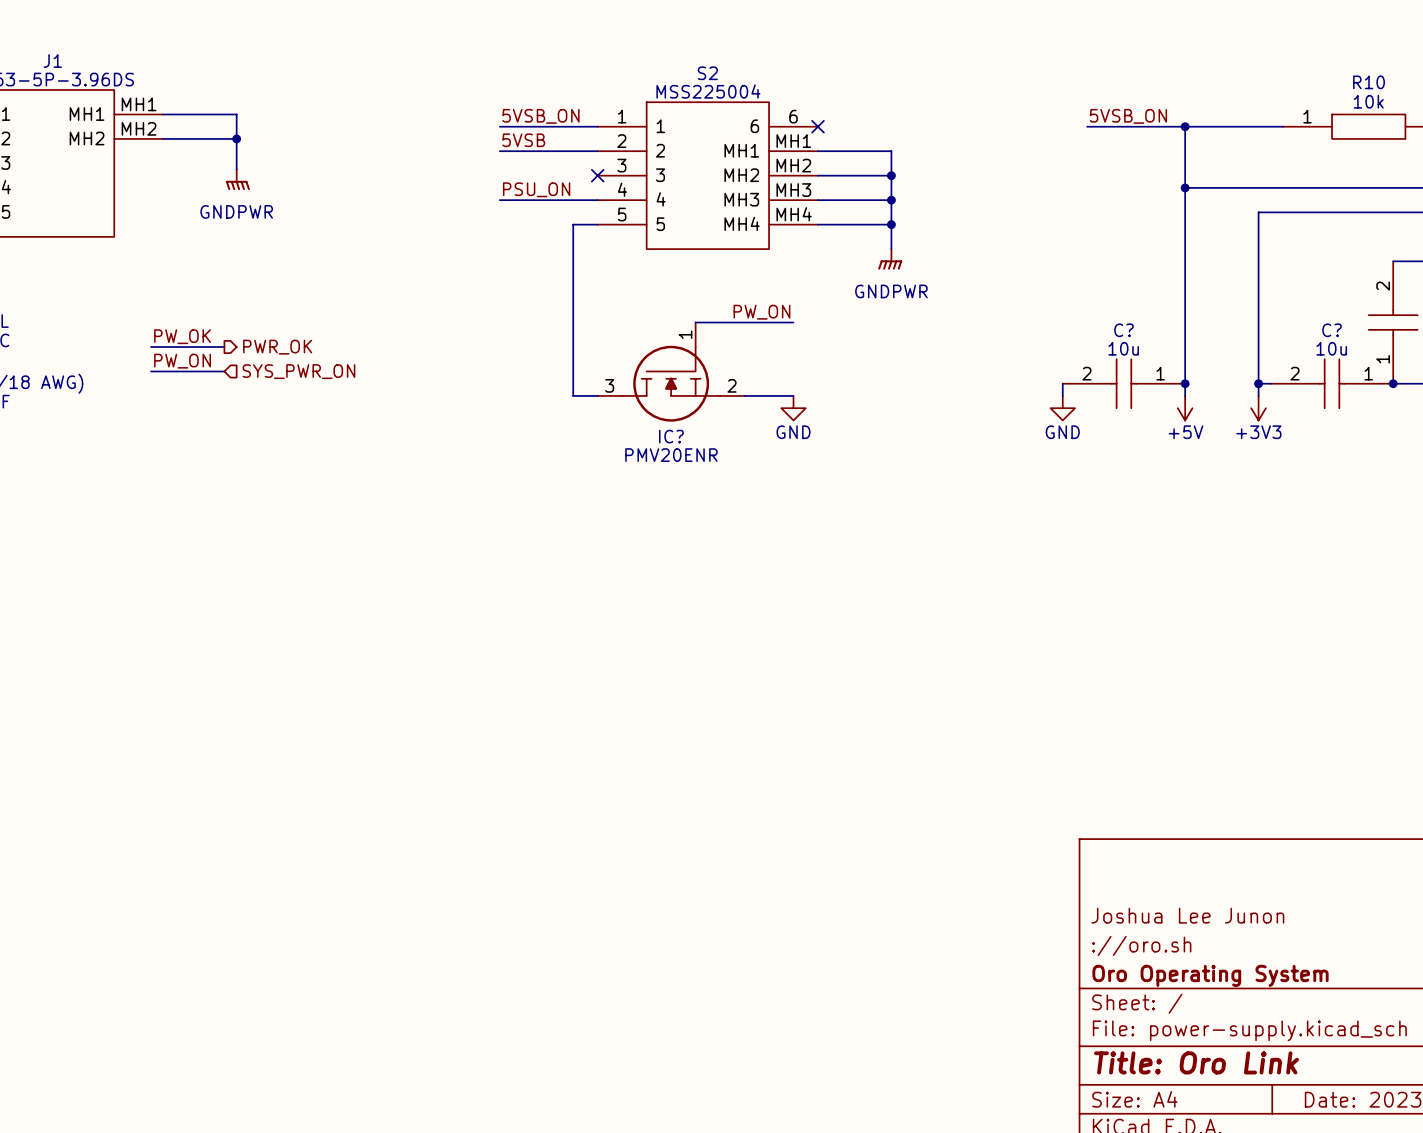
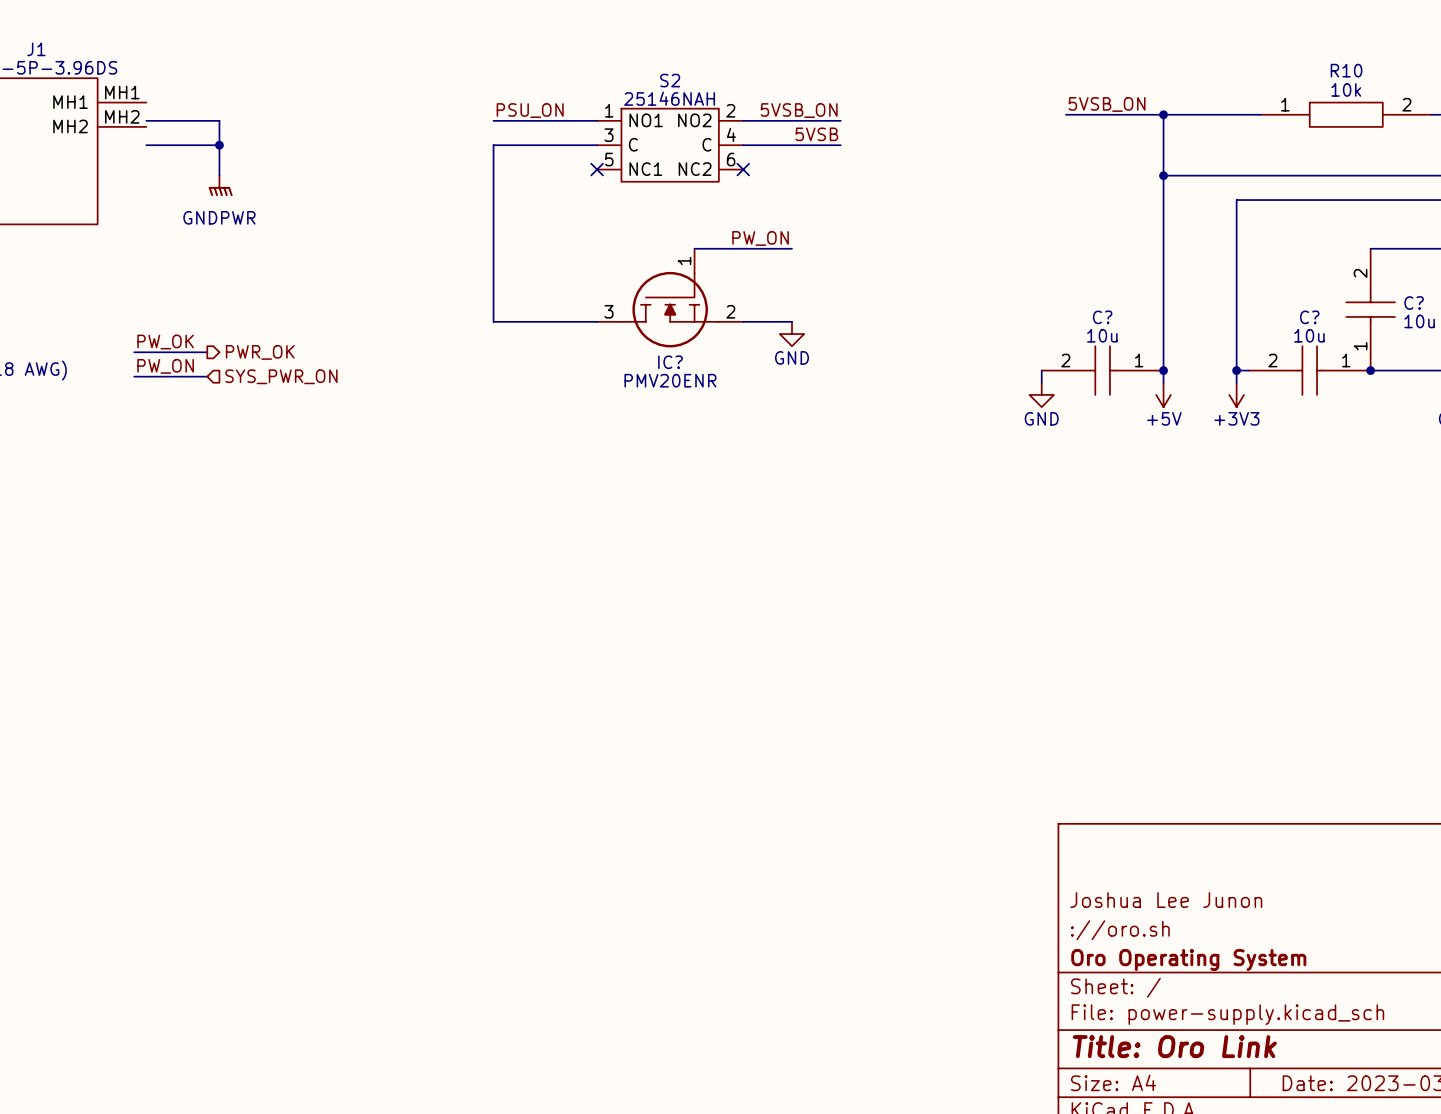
S2 name position: S2 (707, 73) -> S2 (670, 80)
S2 value: MSS225004 (708, 91) -> 25146NAH (669, 98)
S2 symbol: [597, 101, 818, 250] -> [597, 108, 744, 182]
wire: (163, 114) (236, 114) (236, 132) -> (146, 120) (219, 120)
label: 5VSB_ON (540, 116) -> none
label: none -> 5VSB_ON (799, 110)
wire: (499, 126) (597, 126) -> none
no-connect mark: (817, 126) -> none
wire: none -> (493, 120) (597, 120)
wire: none -> (743, 120) (840, 120)
wire: (163, 138) (236, 138) -> (146, 145) (219, 145)
junction position: (236, 138) -> (219, 145)
label: 5VSB (523, 140) -> none
label: none -> 5VSB (816, 134)
wire: (499, 151) (597, 151) -> none
wire: (817, 151) (891, 151) (891, 249) -> none
wire: none -> (597, 145) (493, 145) (493, 321) (597, 321)
wire: none -> (743, 145) (840, 145)
no-connect mark position: (597, 175) -> (597, 169)
wire: (817, 175) (891, 175) -> none
junction: (891, 175) -> none
power symbol position: GNDPWR (237, 179) -> GNDPWR (220, 185)
no-connect mark: none -> (743, 169)
label position: PSU_ON (536, 189) -> PSU_ON (530, 110)
wire: (499, 200) (597, 200) -> none
wire: (817, 200) (891, 200) -> none
junction: (891, 200) -> none
wire: (597, 224) (573, 224) (573, 395) (597, 395) -> none
wire: (817, 224) (891, 224) -> none
junction: (891, 224) -> none
power symbol: GNDPWR (890, 259) -> none
label position: PW_ON (761, 312) -> PW_ON (760, 238)
wire: (695, 322) (793, 322) -> (694, 248) (791, 248)
label position: PW_OK (182, 336) -> PW_OK (165, 342)
wire: (151, 347) (224, 347) -> (134, 352) (207, 352)
hierarchical label position: PWR_OK (277, 347) -> PWR_OK (260, 352)
label position: PW_ON (182, 361) -> PW_ON (165, 366)
wire: (151, 371) (224, 371) -> (134, 376) (207, 376)
hierarchical label position: SYS_PWR_ON (298, 371) -> SYS_PWR_ON (281, 376)
IC? position: (671, 372) -> (670, 298)
wire: (744, 395) (793, 395) -> (743, 321) (791, 321)
power symbol position: GND (793, 408) -> GND (791, 334)

